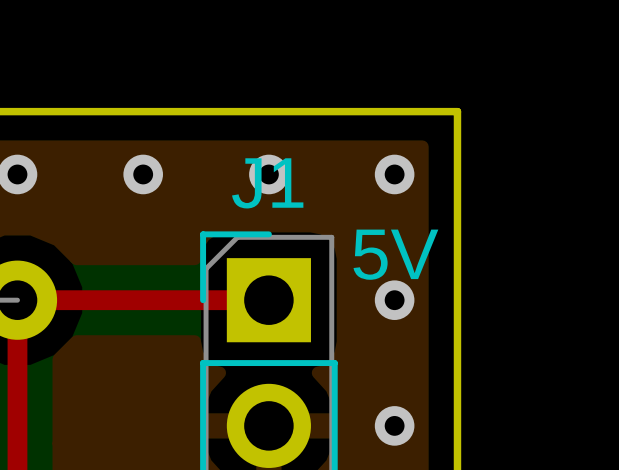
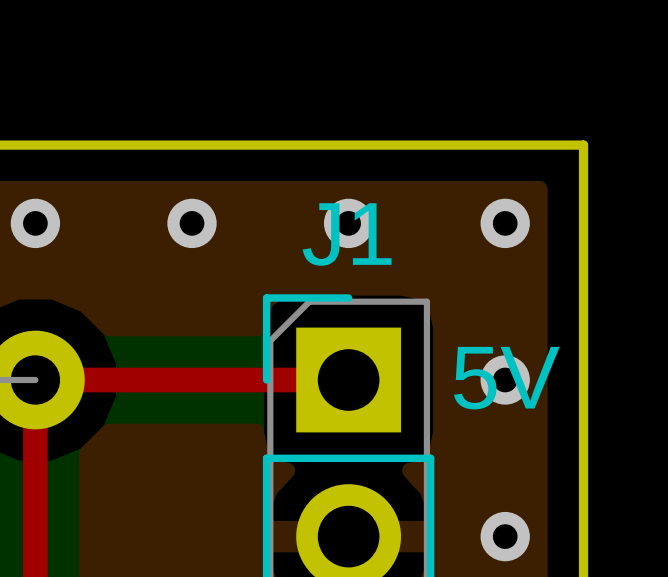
text position: 5V (395, 254) -> 5V (506, 378)

